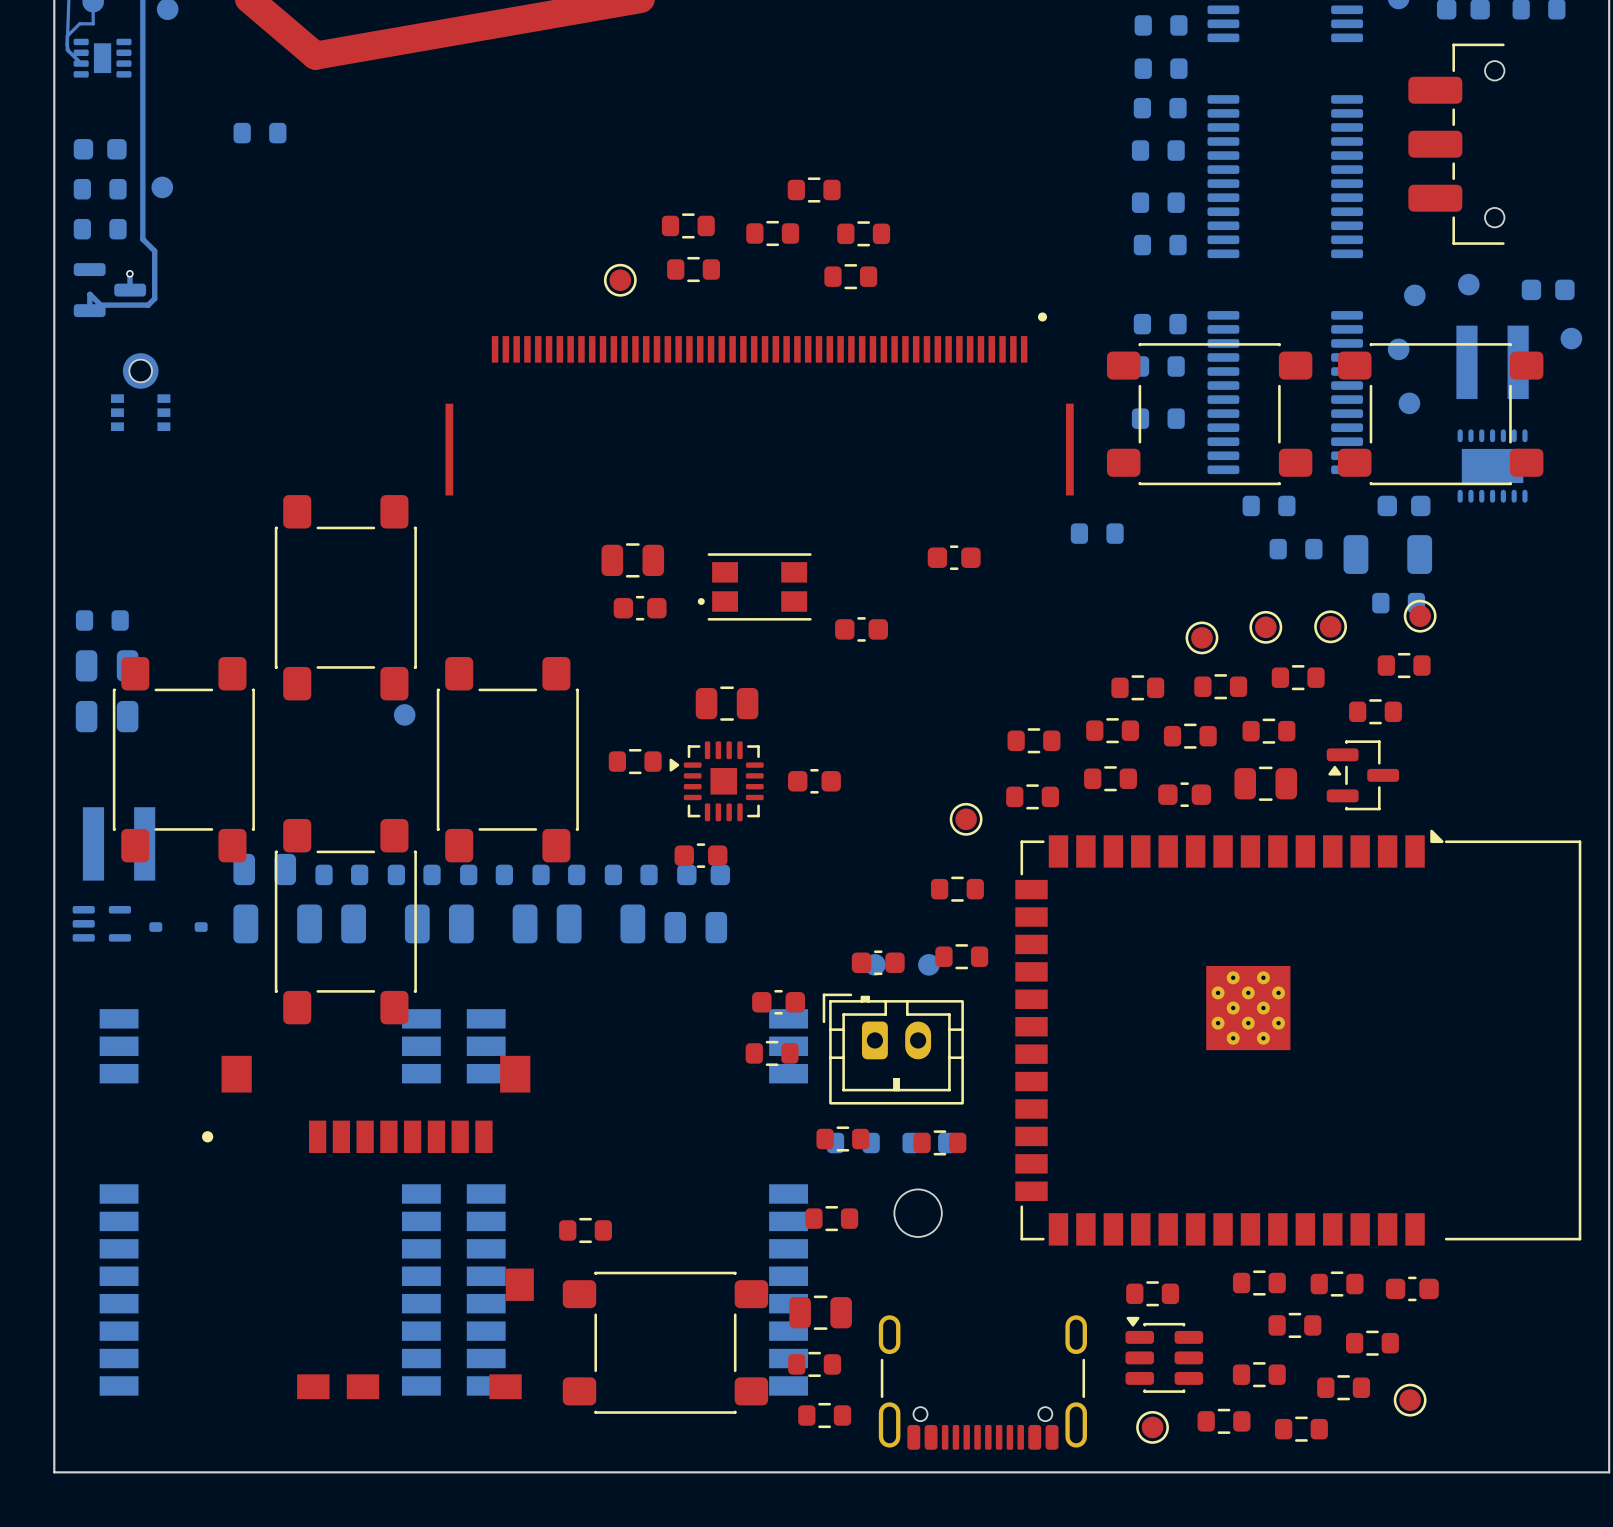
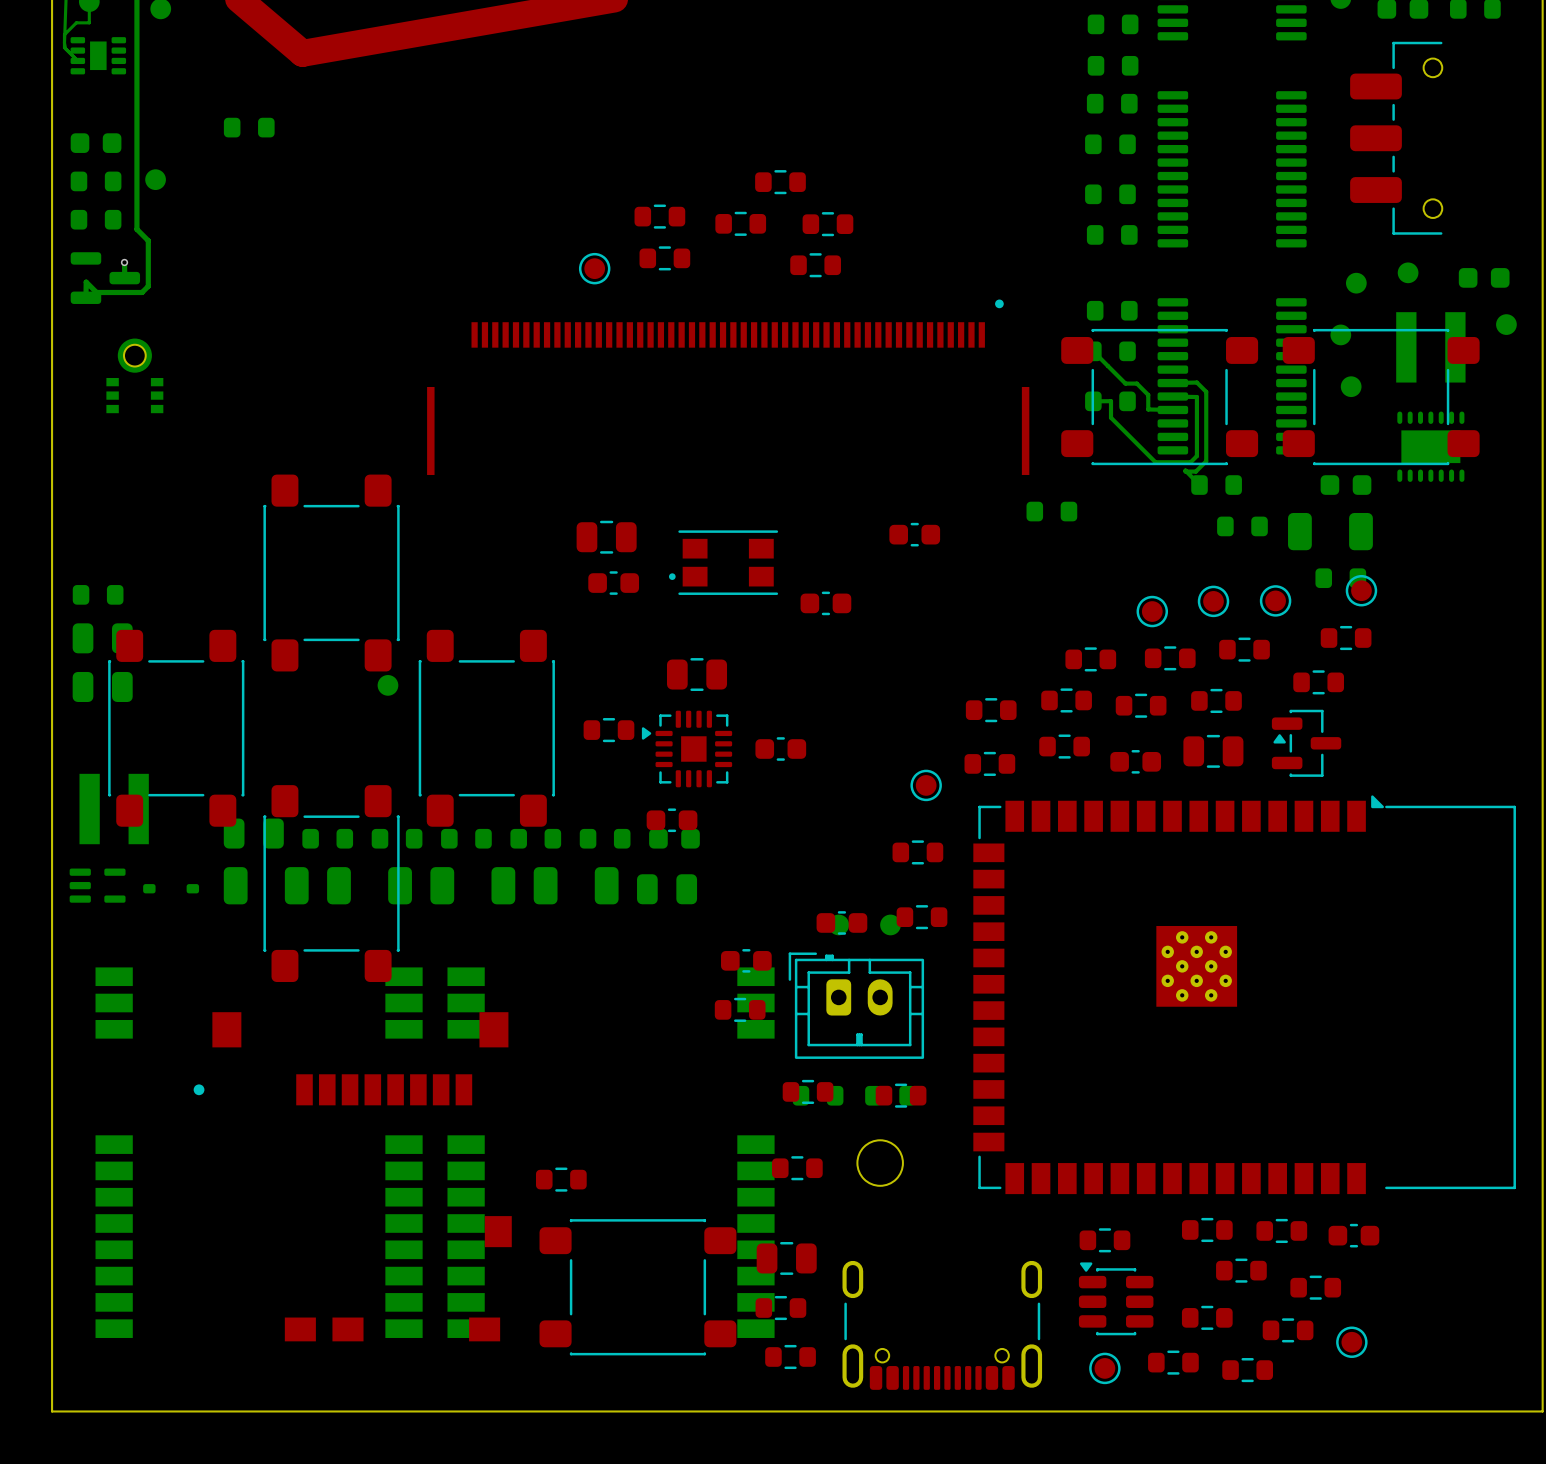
bottom track: none -> (1093, 351) (1125, 383) (1136, 383) (1148, 394) (1148, 409) (1172, 409)
bottom track: none -> (1172, 383) (1196, 382) (1206, 391) (1206, 461) (1195, 471) (1185, 470) (1199, 485)
bottom track: none -> (1172, 396) (1196, 397) (1196, 456) (1190, 462) (1155, 462) (1111, 417) (1111, 401) (1093, 401)

